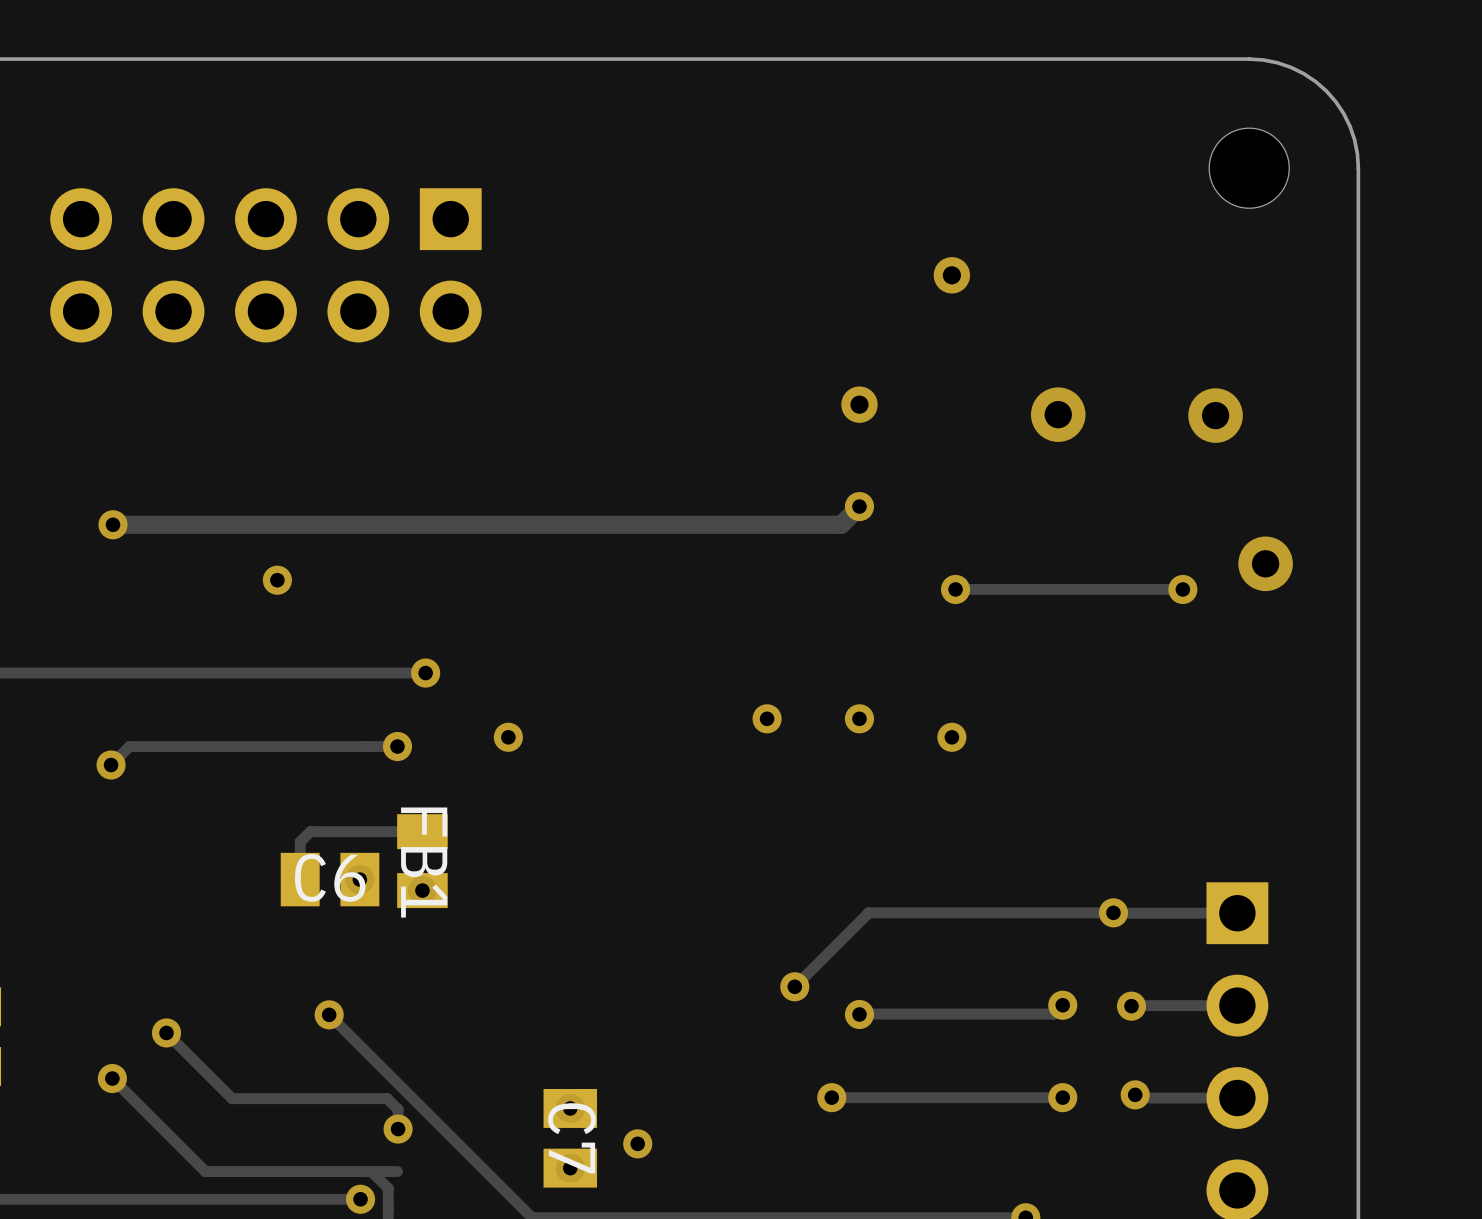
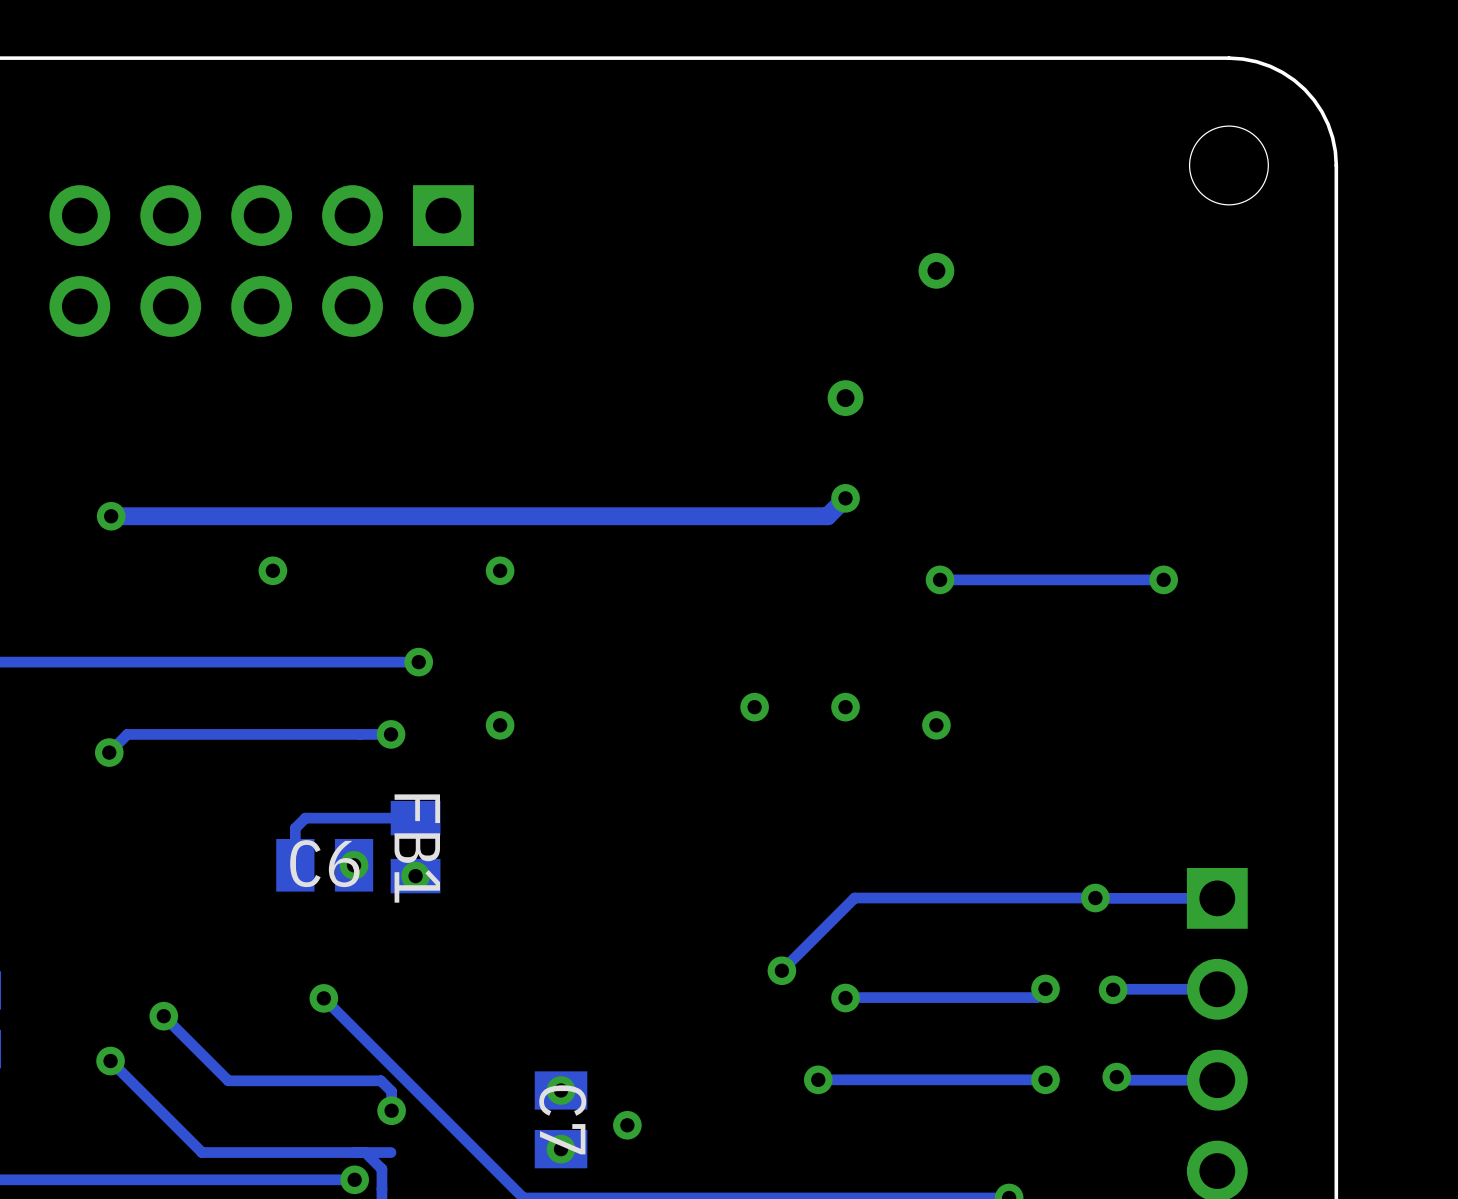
via: (1058, 414) -> none
via: (1215, 415) -> none
via: (1265, 563) -> none
via: none -> (500, 570)

